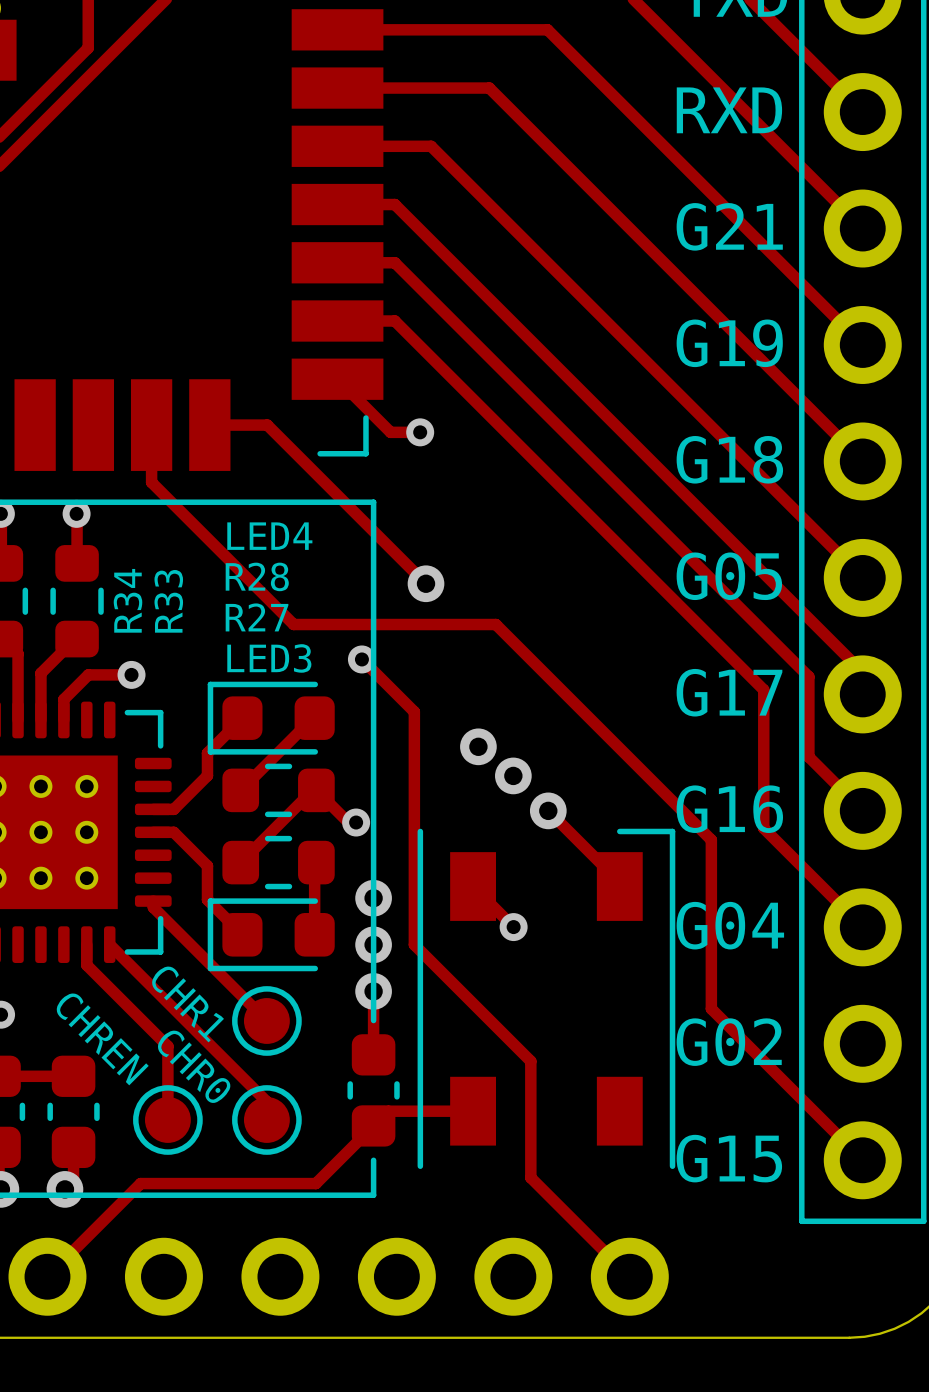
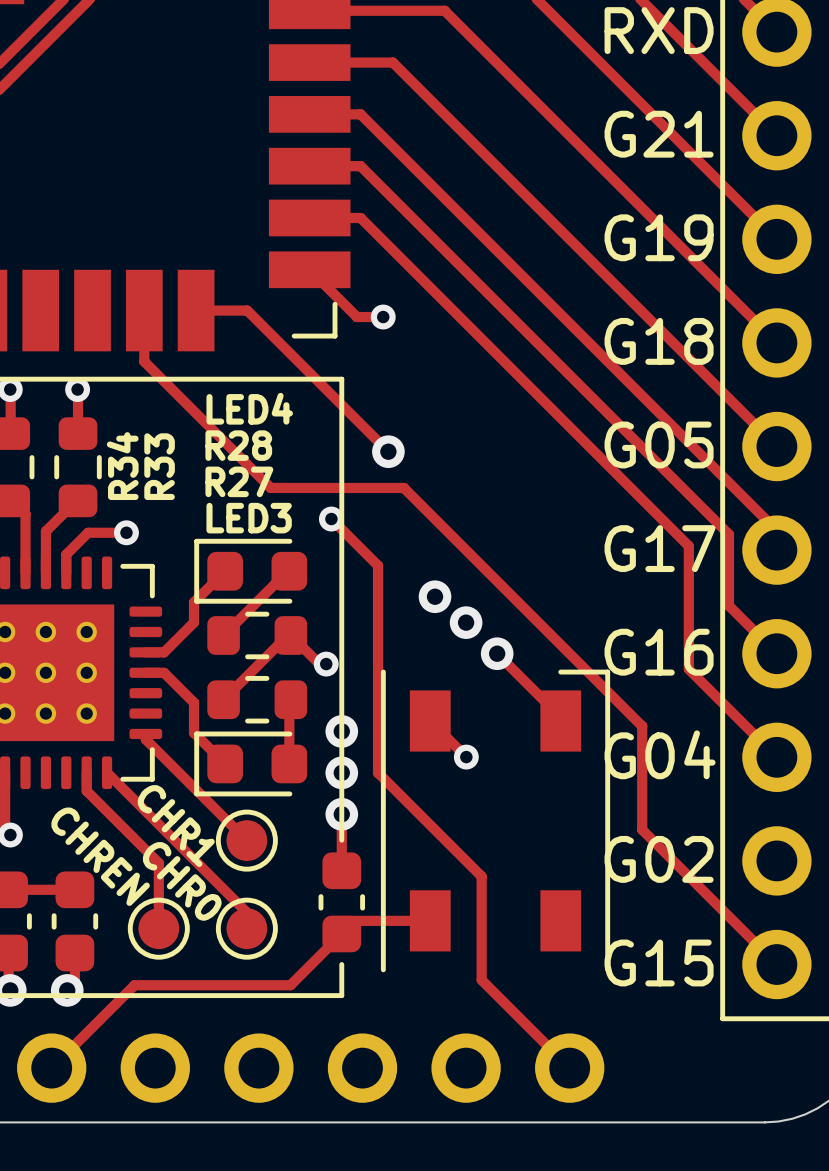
track: (443, 624) (495, 624) (711, 839) (711, 892) -> (403, 487) (642, 726)

